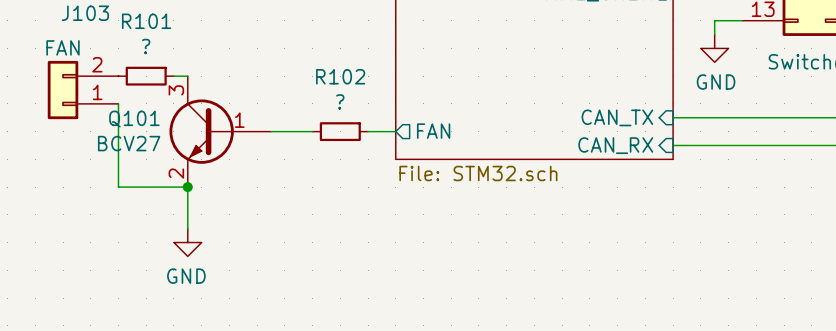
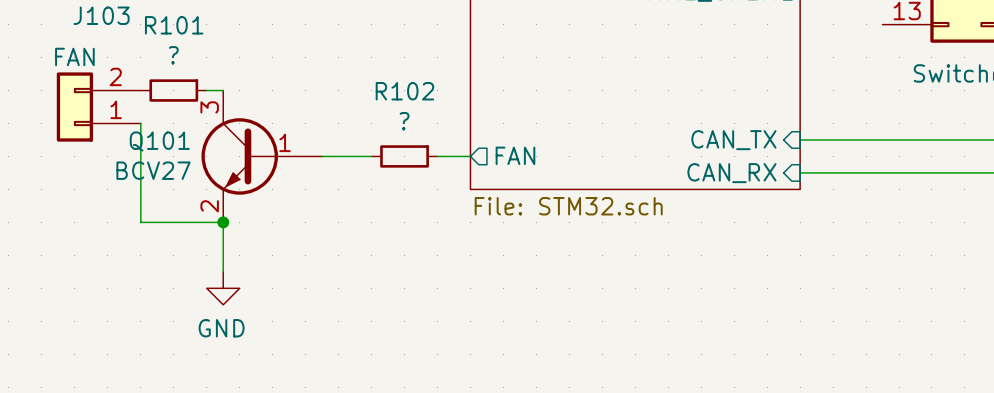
wire: (742, 20) (714, 20) (714, 34) -> none
power symbol: GND (714, 48) -> none

